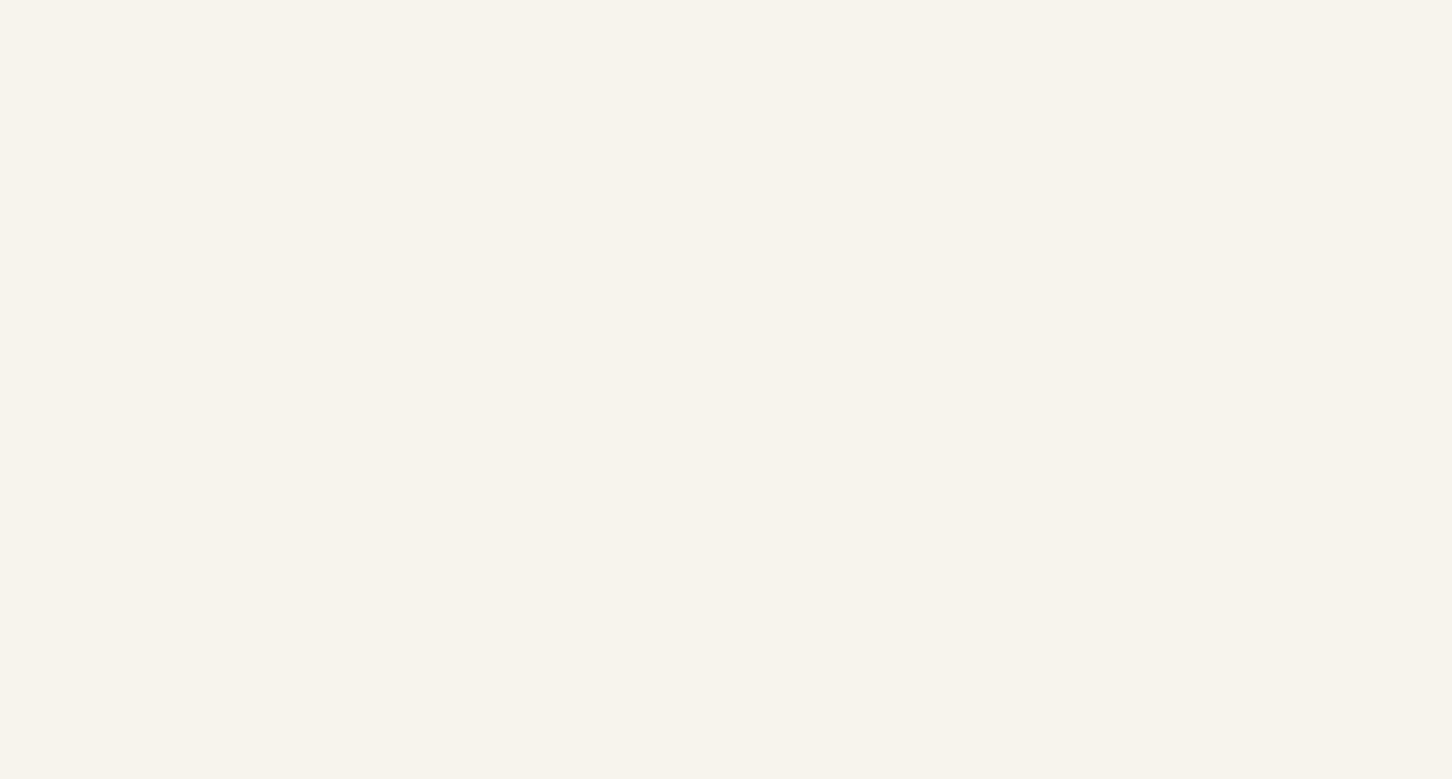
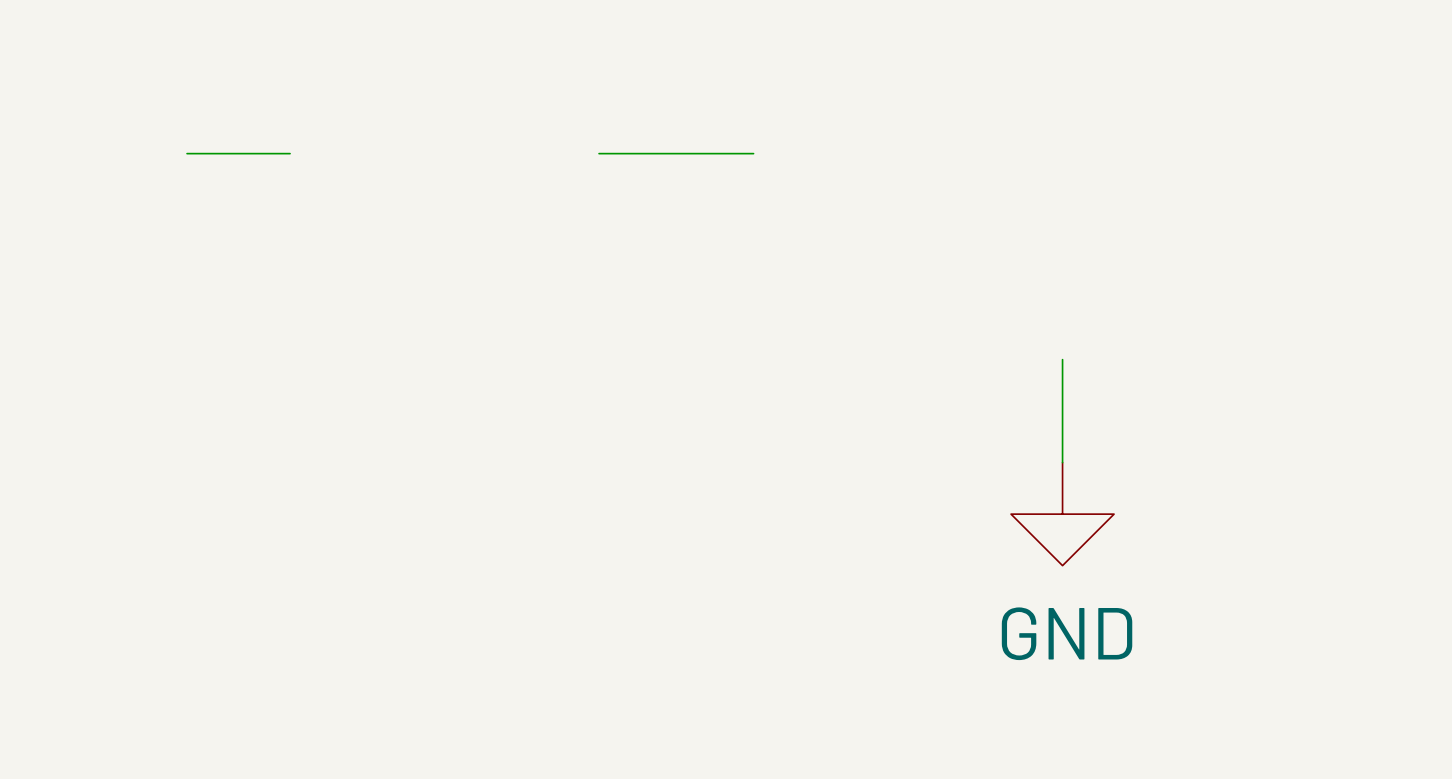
wire: none -> (187, 153) (290, 153)
wire: none -> (599, 153) (753, 153)
wire: none -> (1062, 359) (1062, 462)
power symbol: none -> GND (1062, 514)

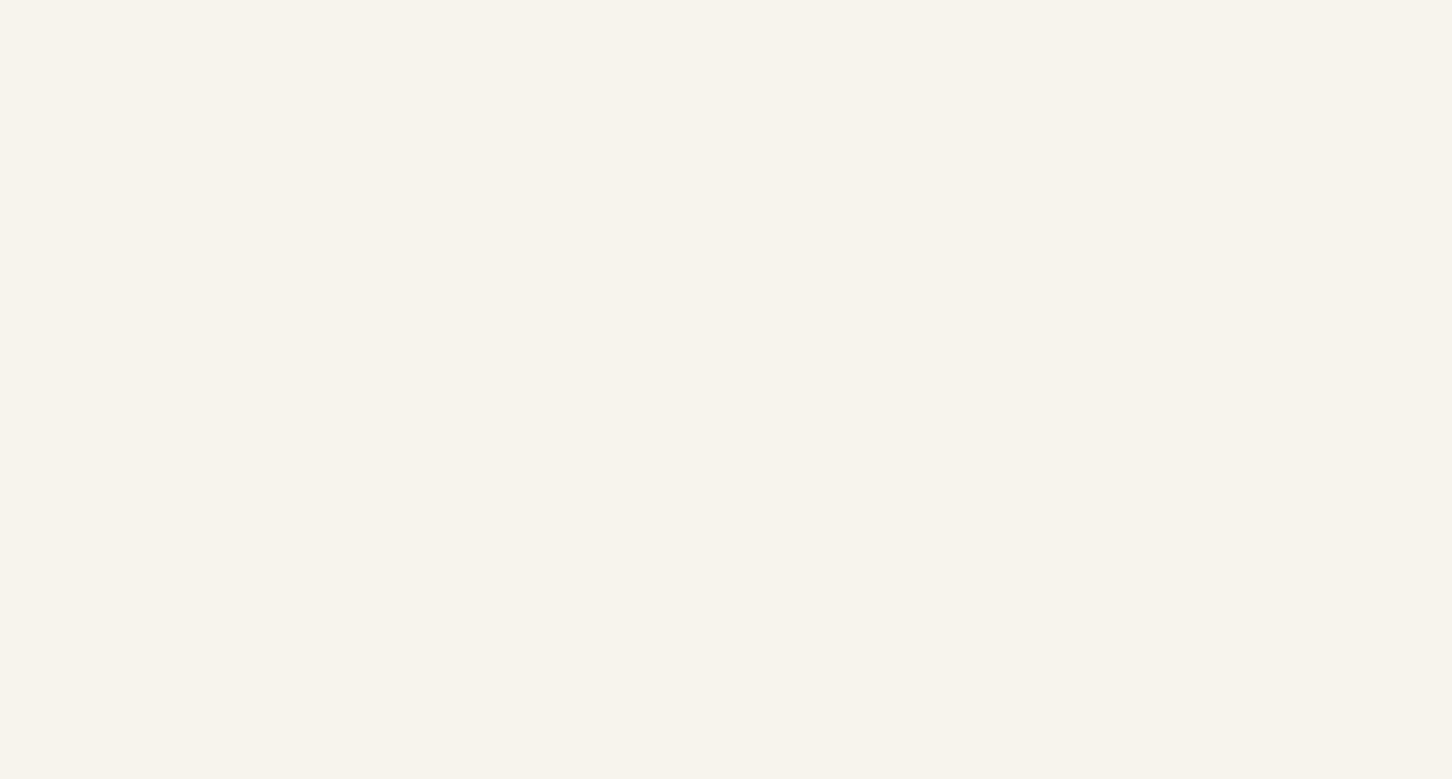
wire: (187, 153) (290, 153) -> none
wire: (599, 153) (753, 153) -> none
wire: (1062, 359) (1062, 462) -> none
power symbol: GND (1062, 514) -> none

